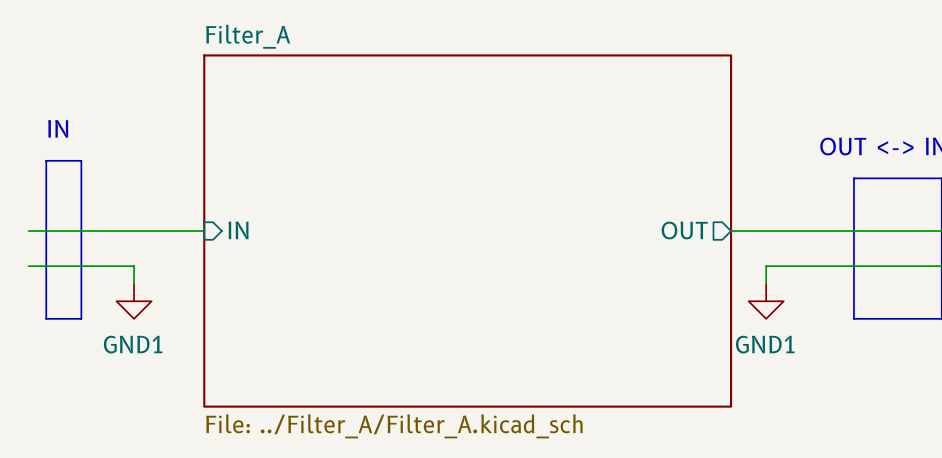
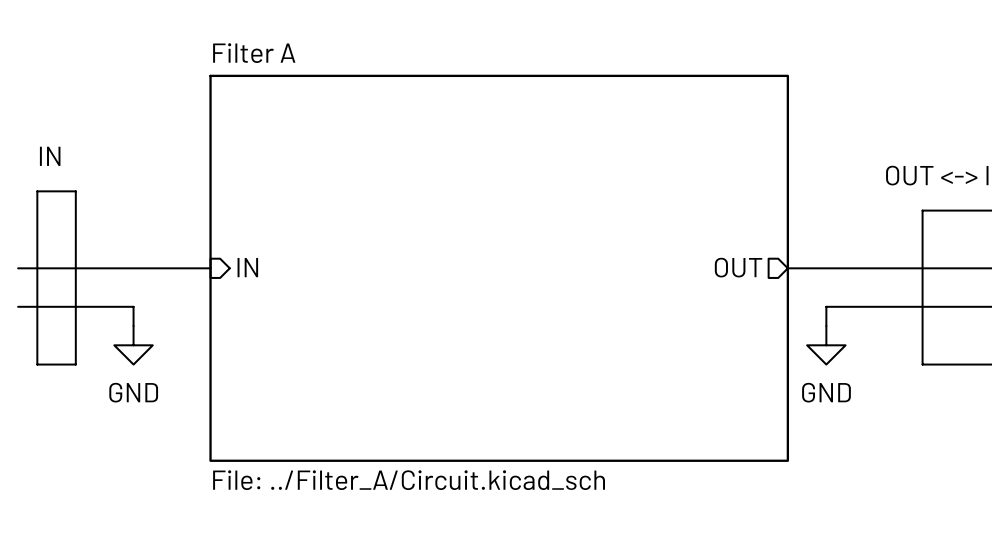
sheet Filter_A name: Filter_A (248, 36) -> Filter A (254, 53)
power symbol: GND1 (134, 301) -> GND (133, 345)
power symbol: GND1 (766, 301) -> GND (826, 345)
sheet Filter_A value: File: ../Filter_A/Filter_A.kicad_sch (394, 426) -> File: ../Filter_A/Circuit.kicad_sch (409, 480)

